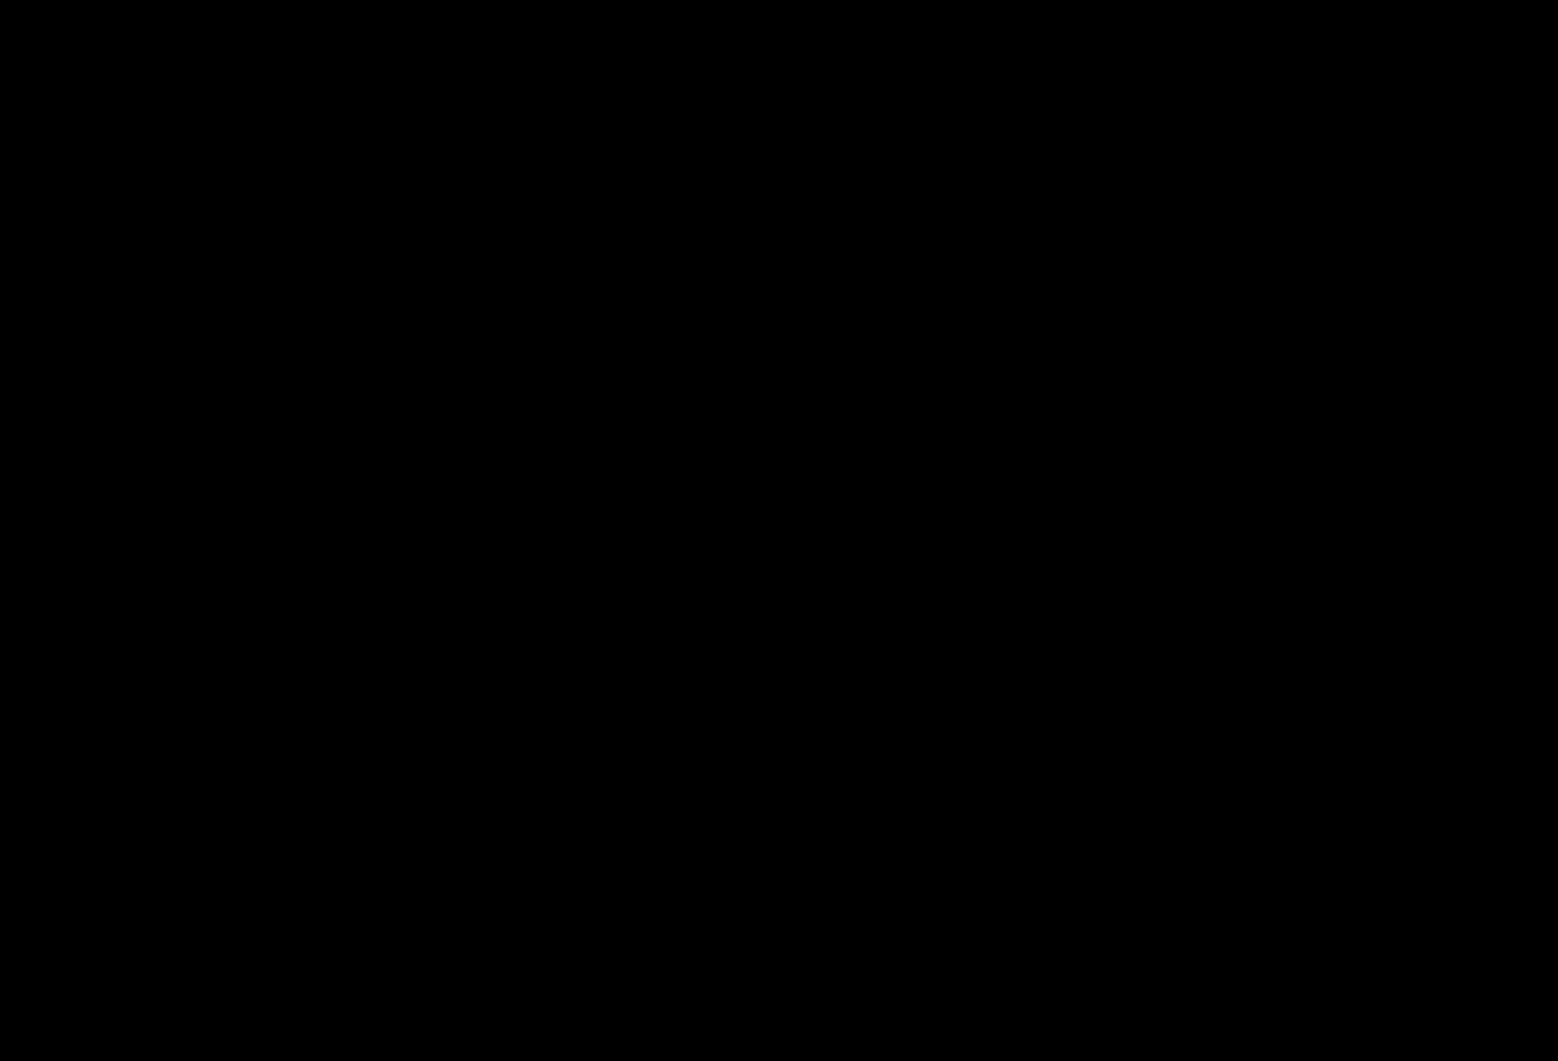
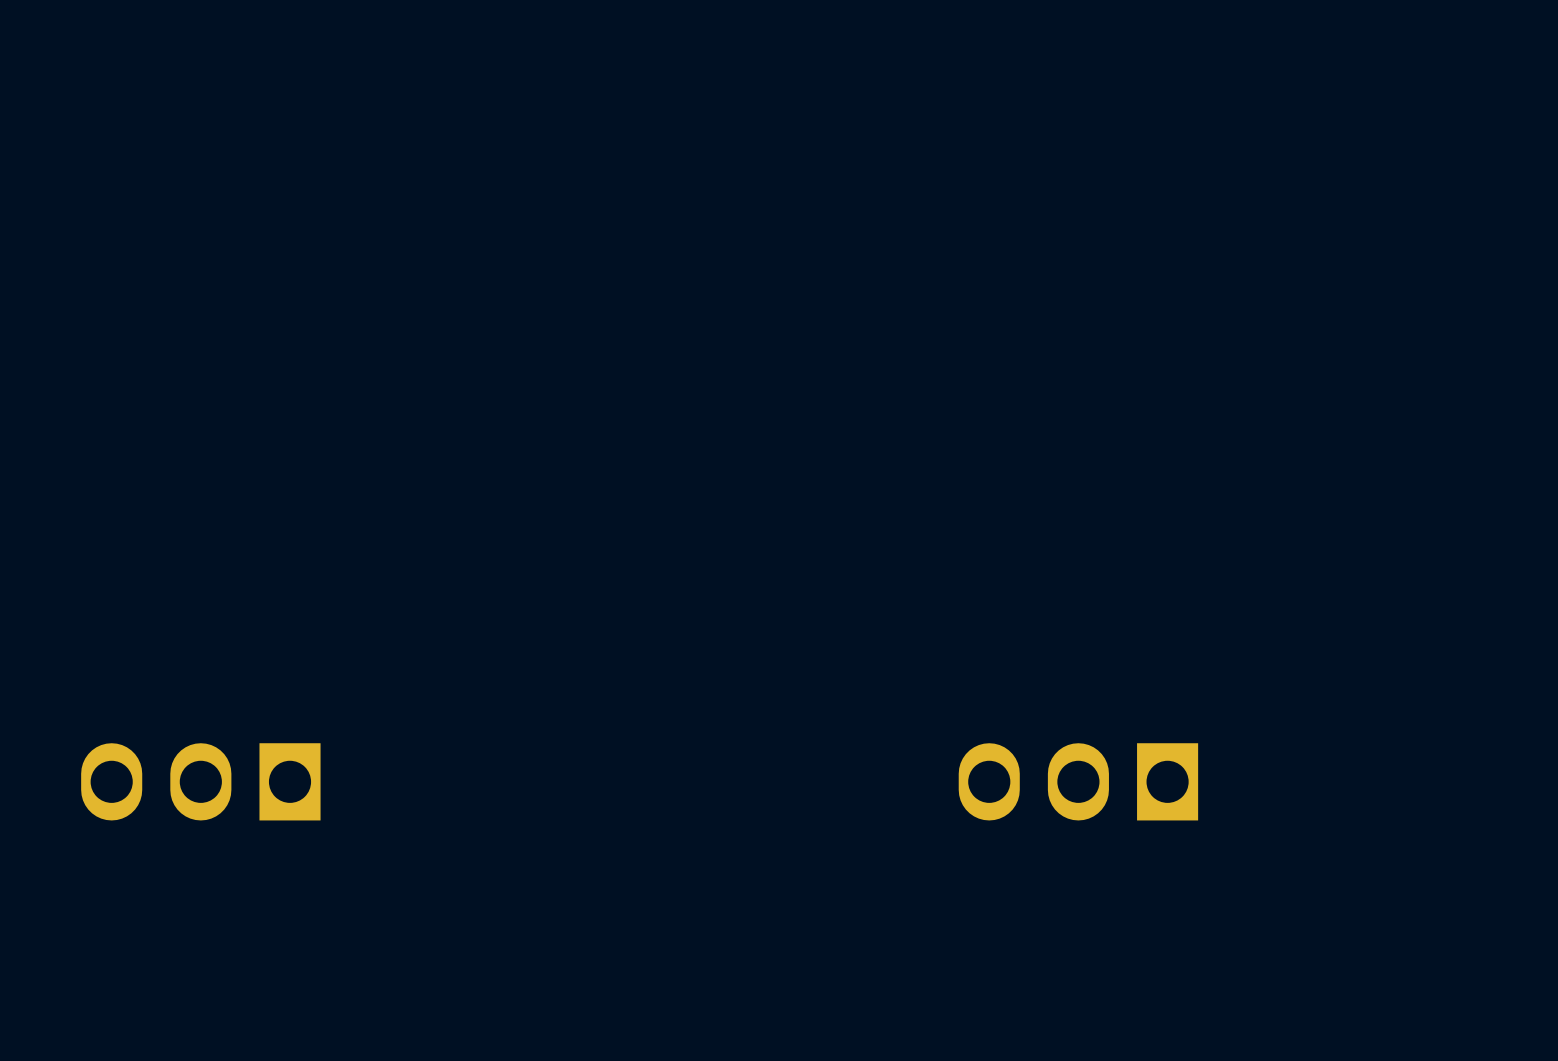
part: none -> (200, 781)
part: none -> (1078, 781)

